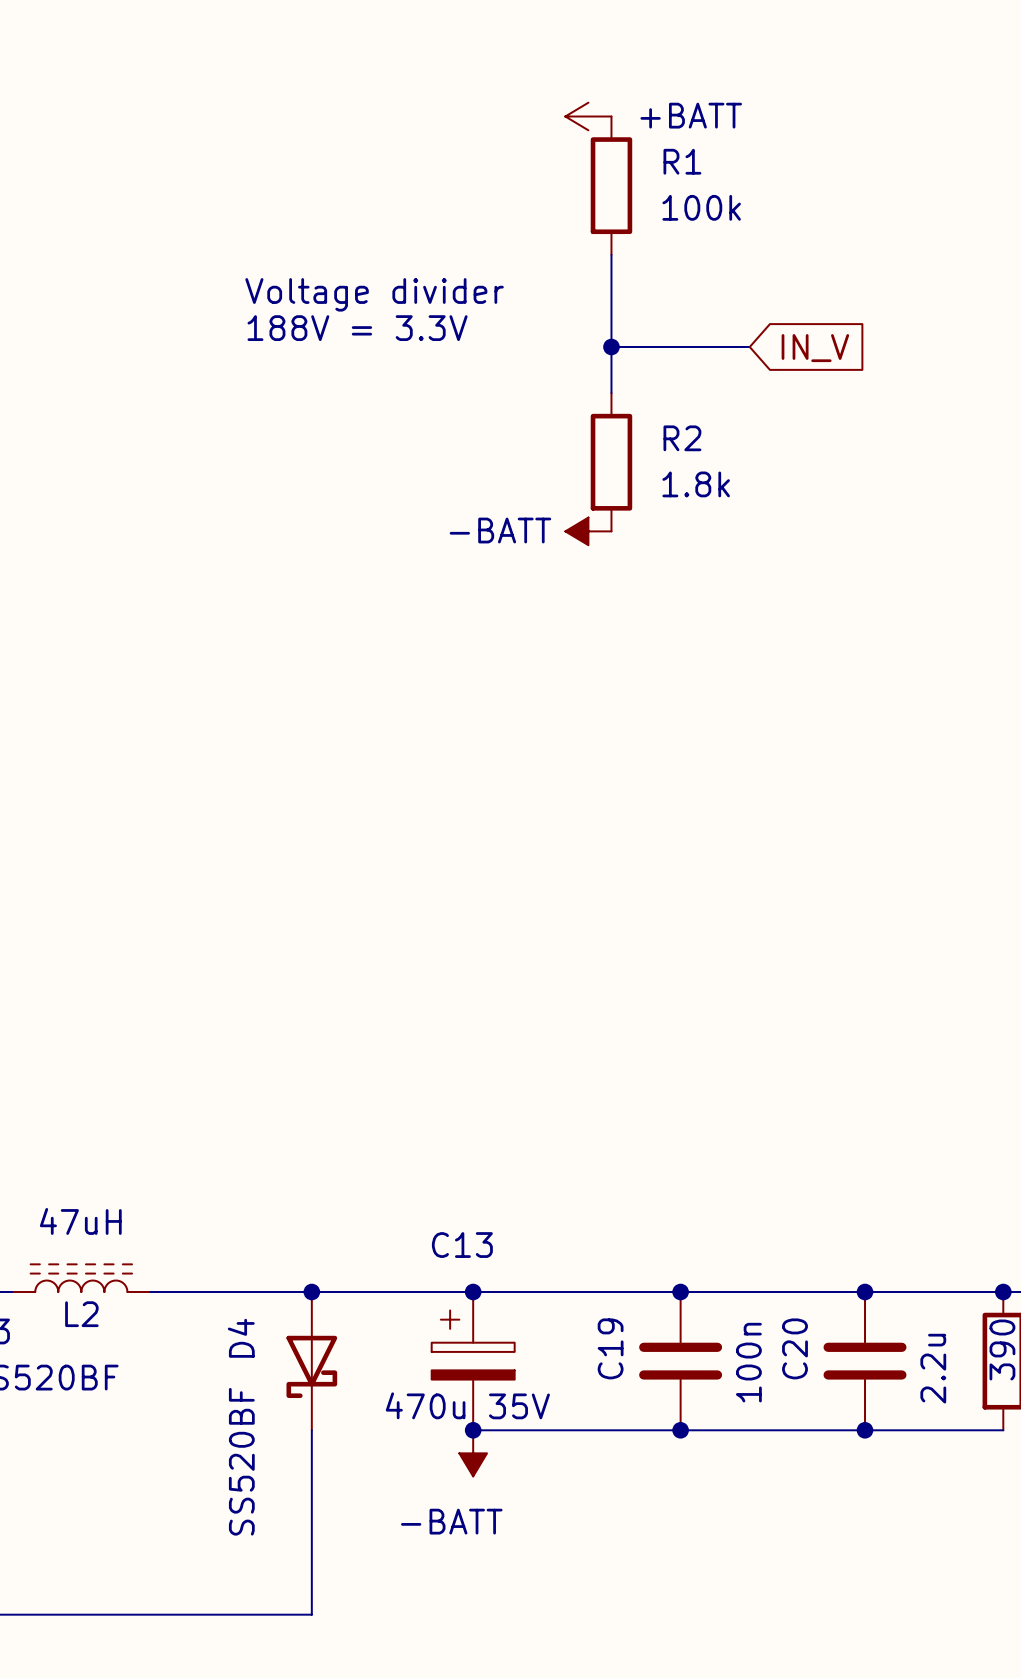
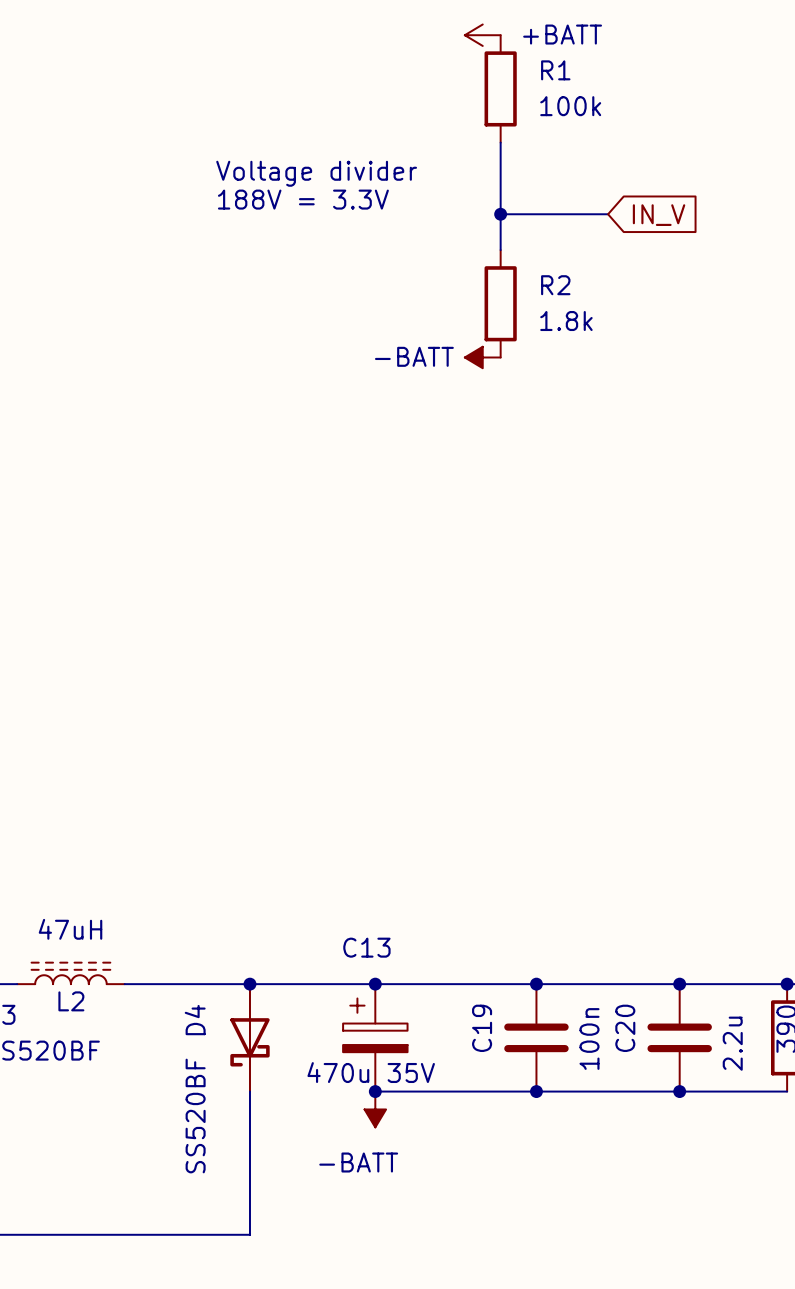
power symbol position: +BATT (588, 116) -> +BATT (482, 35)
R1 position: (611, 185) -> (500, 88)
wire: (611, 254) (611, 393) -> (500, 142) (500, 250)
text position: Voltage divider (374, 294) -> Voltage divider (316, 173)
text position: 188V = 3.3V (357, 328) -> 188V = 3.3V (303, 199)
wire: (611, 346) (749, 346) -> (500, 214) (608, 214)
junction position: (611, 346) -> (500, 214)
global label position: IN_V (815, 348) -> IN_V (659, 215)
R2 position: (611, 462) -> (500, 303)
power symbol position: -BATT (588, 531) -> -BATT (482, 357)

